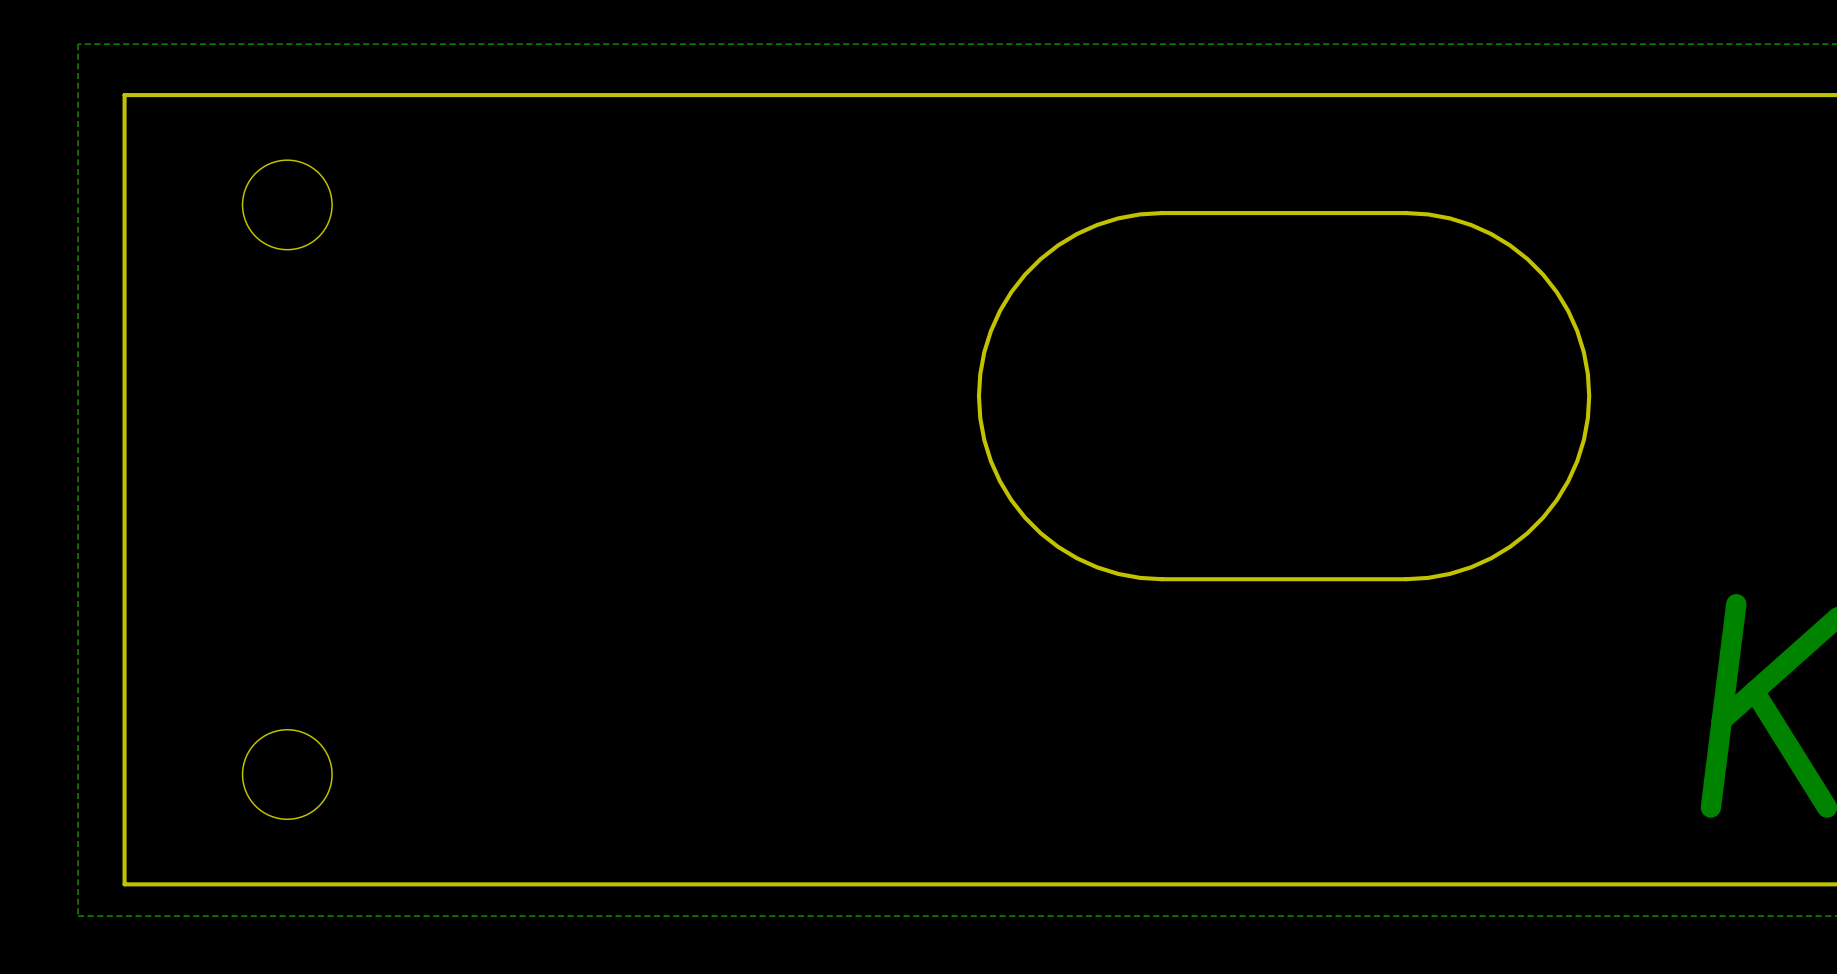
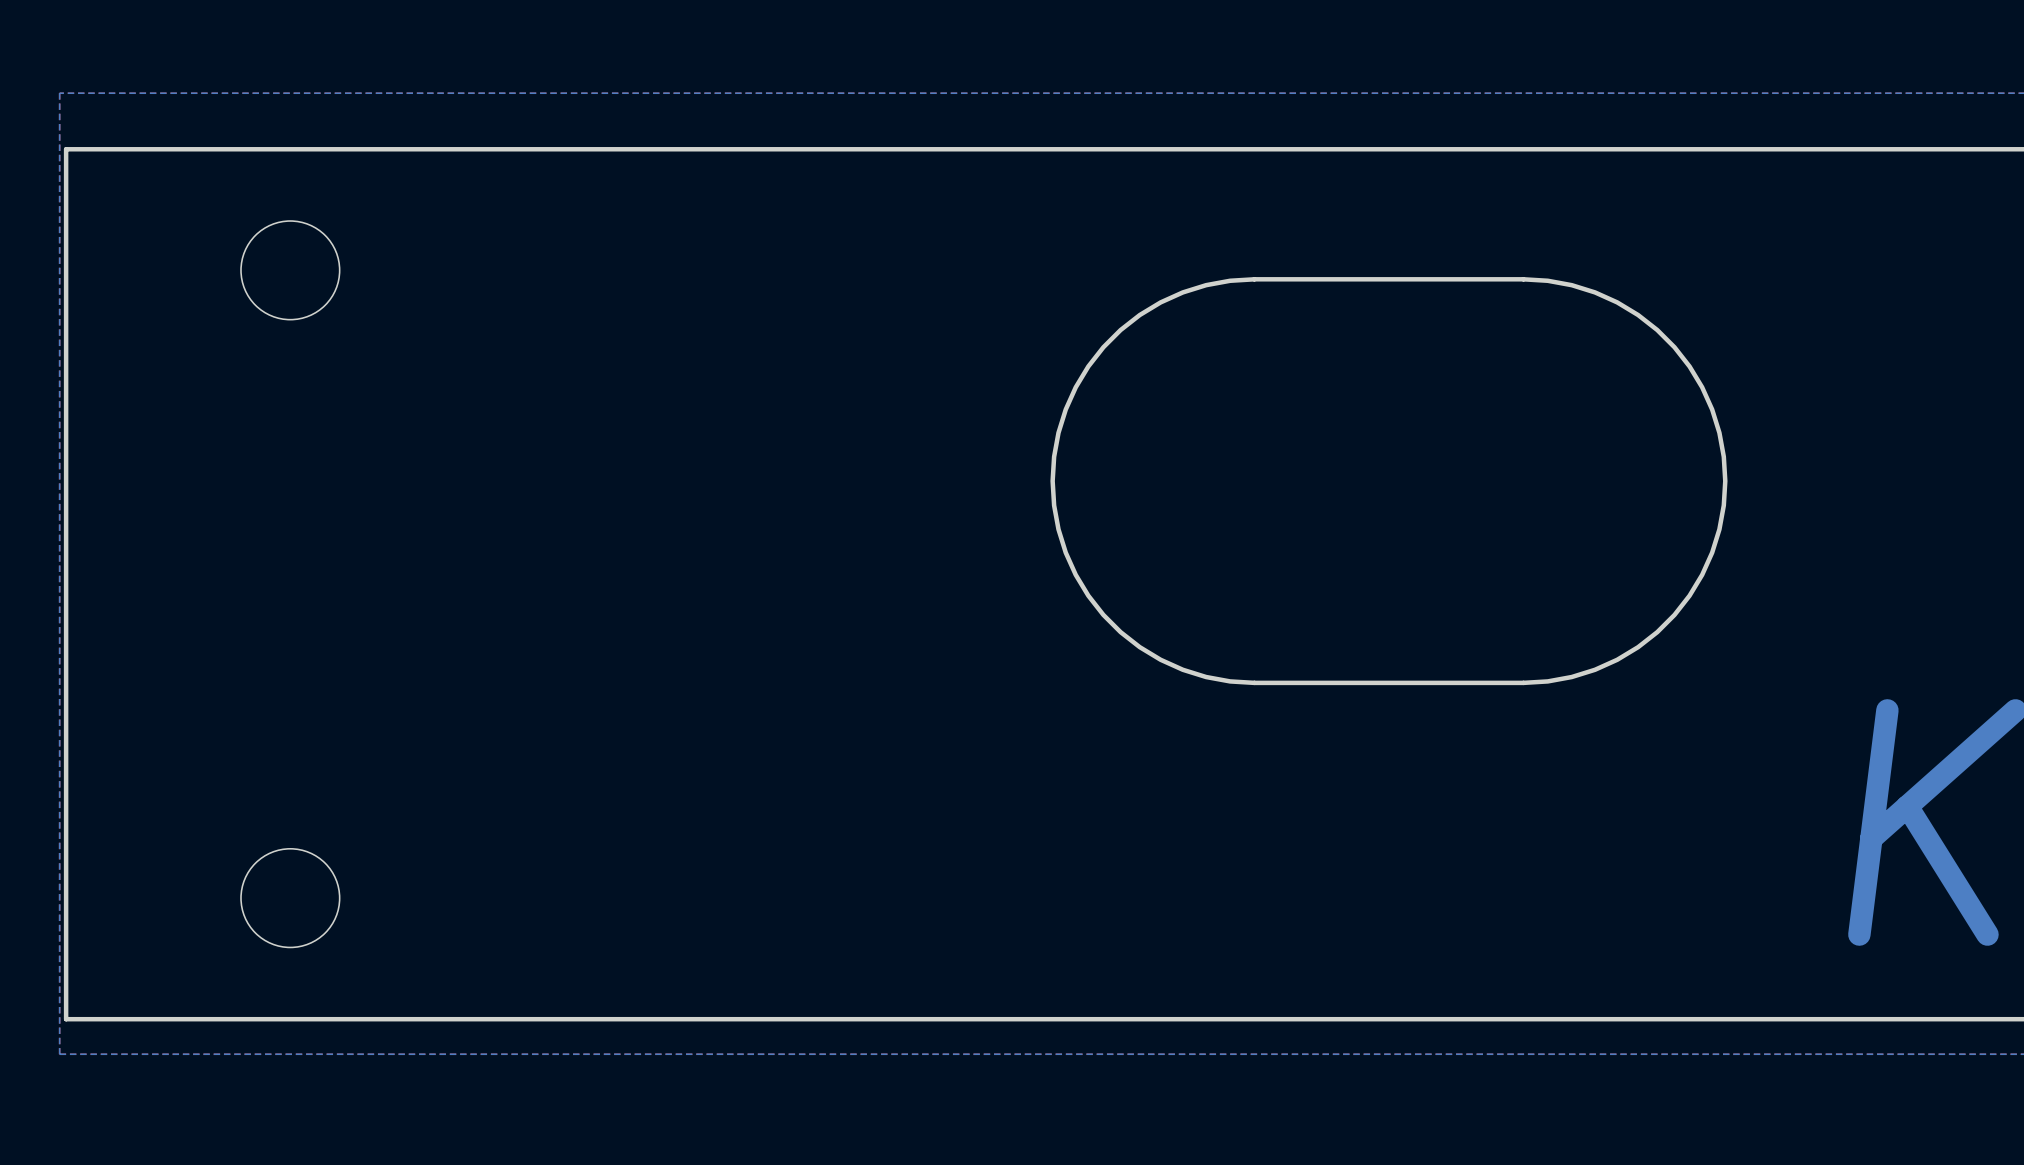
board edge: (124, 95) (124, 884) -> (110, 149) (66, 149) (66, 1019) (110, 1019)

